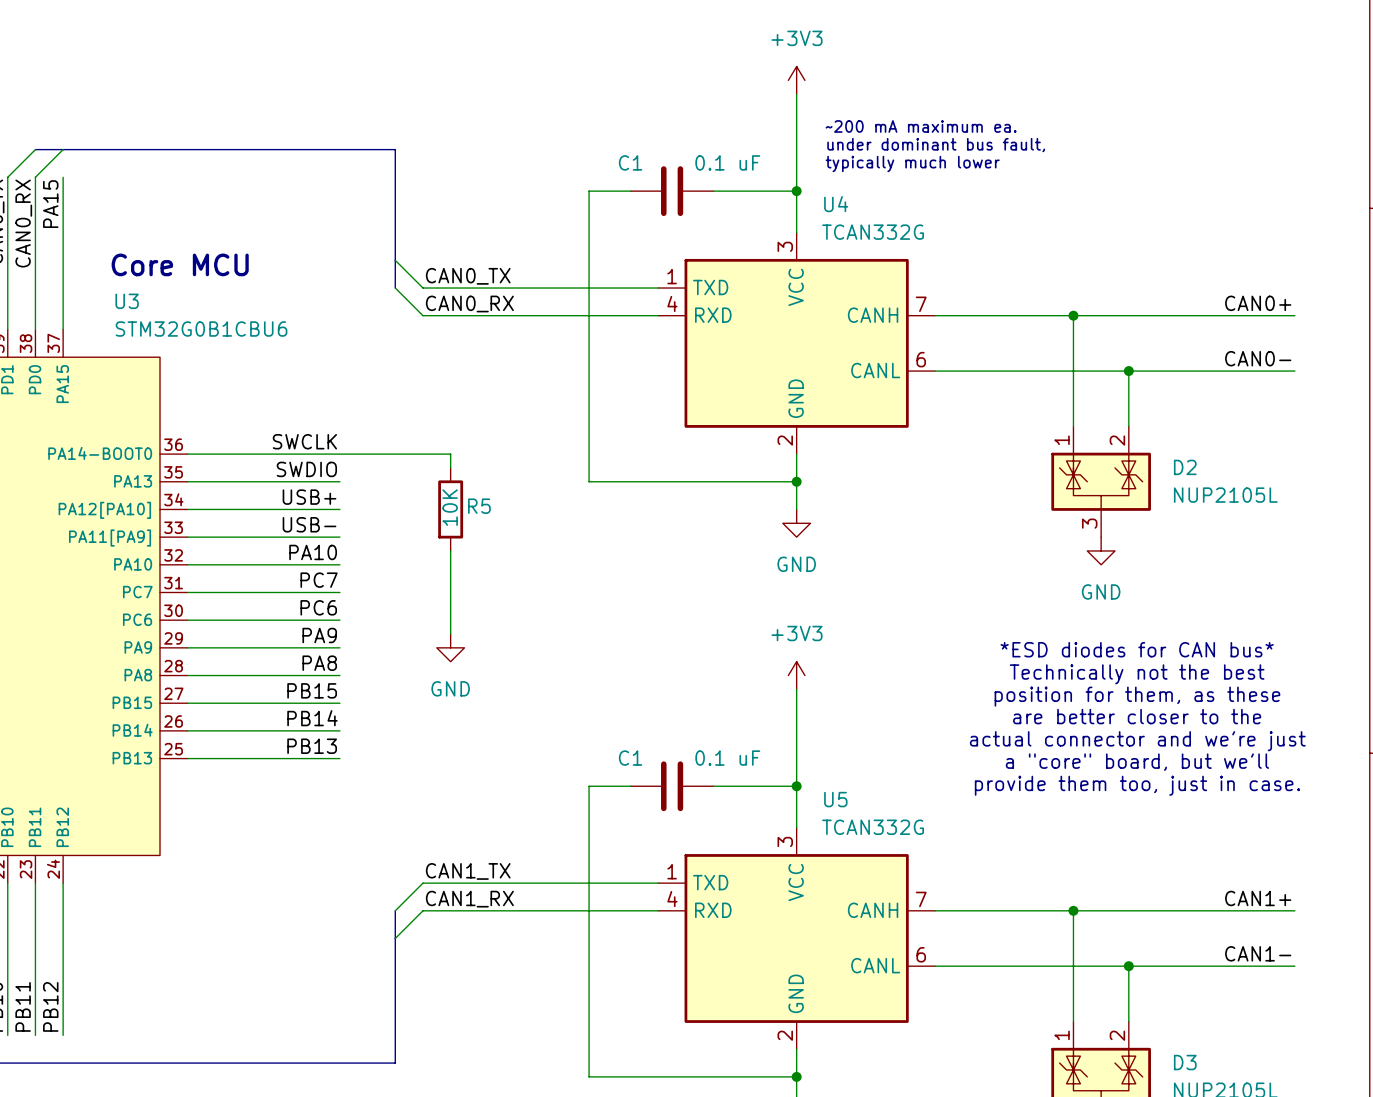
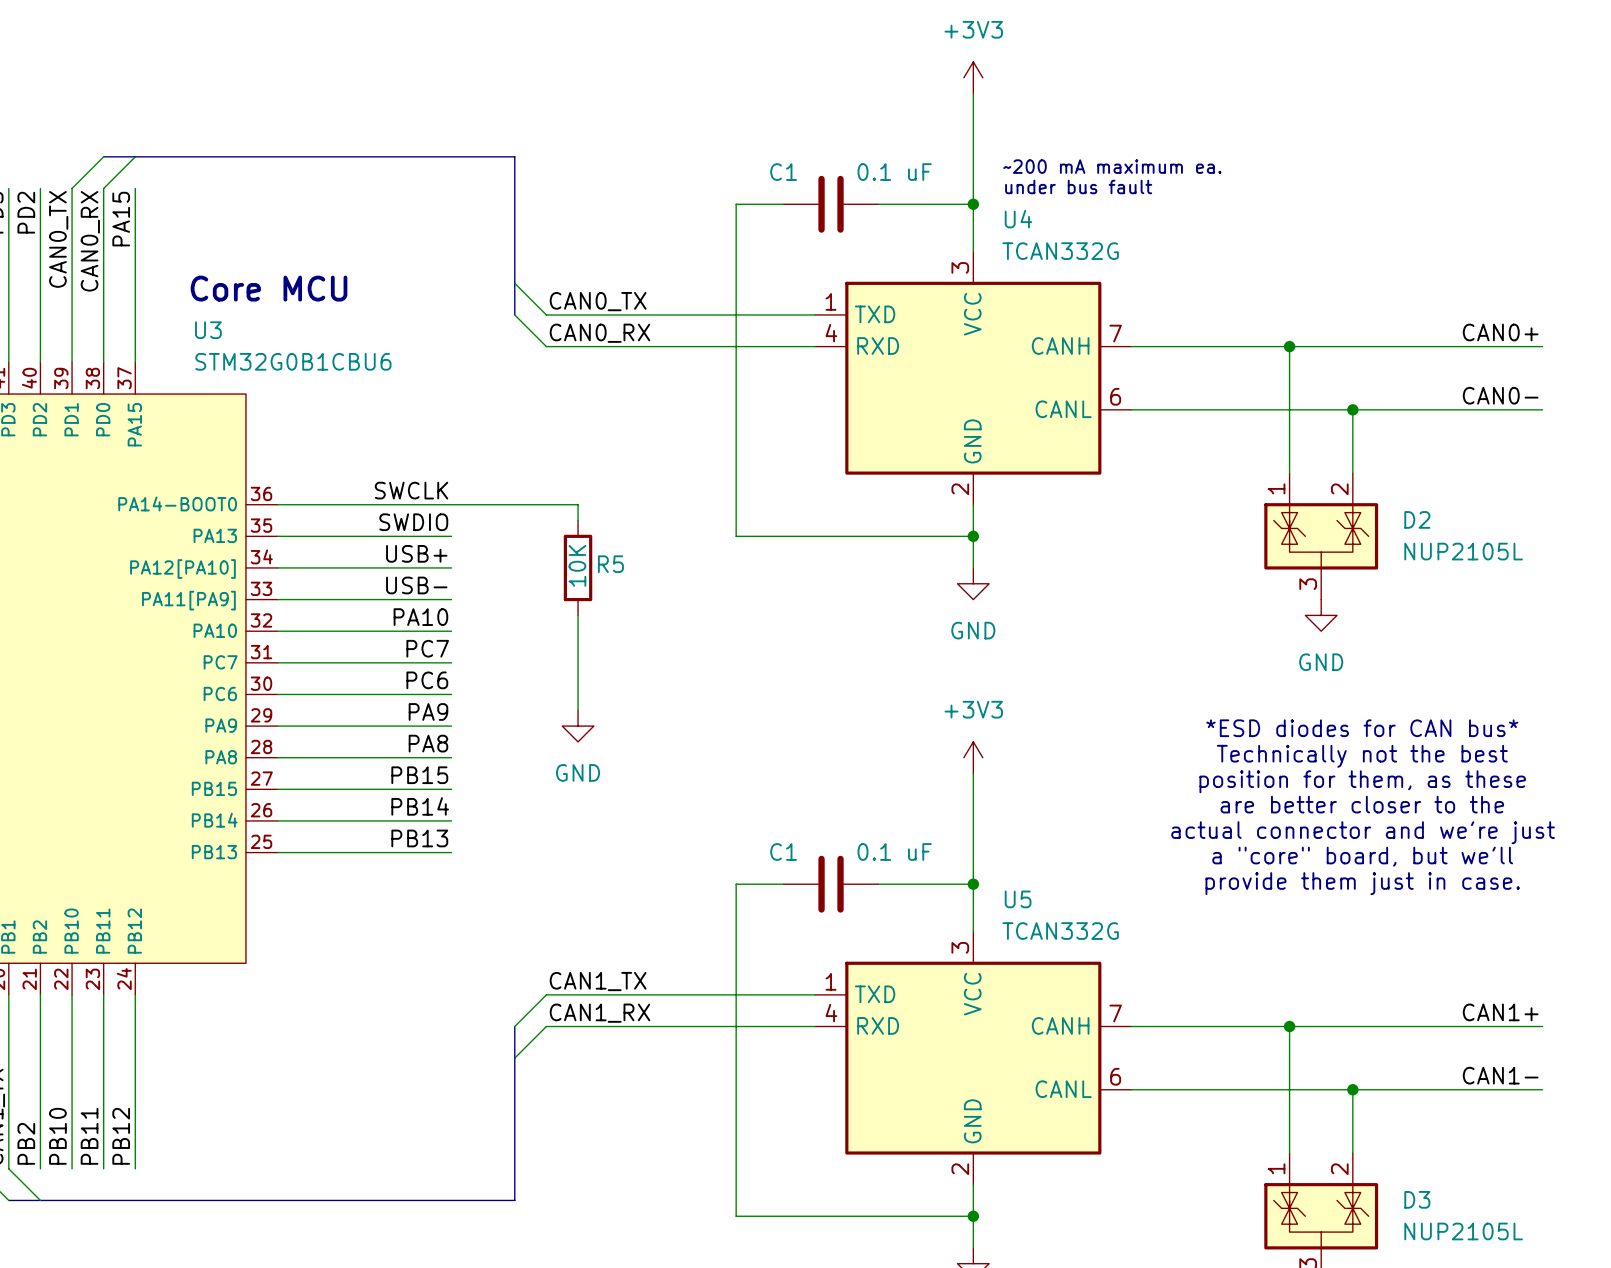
text: ~200 mA maximum ea. (921, 126) -> none
text: under dominant bus fault, (936, 145) -> none
text: typically much lower (912, 163) -> ~200 mA maximum ea. (1112, 166)
text: none -> under bus fault (1078, 186)
text: provide them too, just in case. (1137, 785) -> provide them just in case. (1362, 883)

